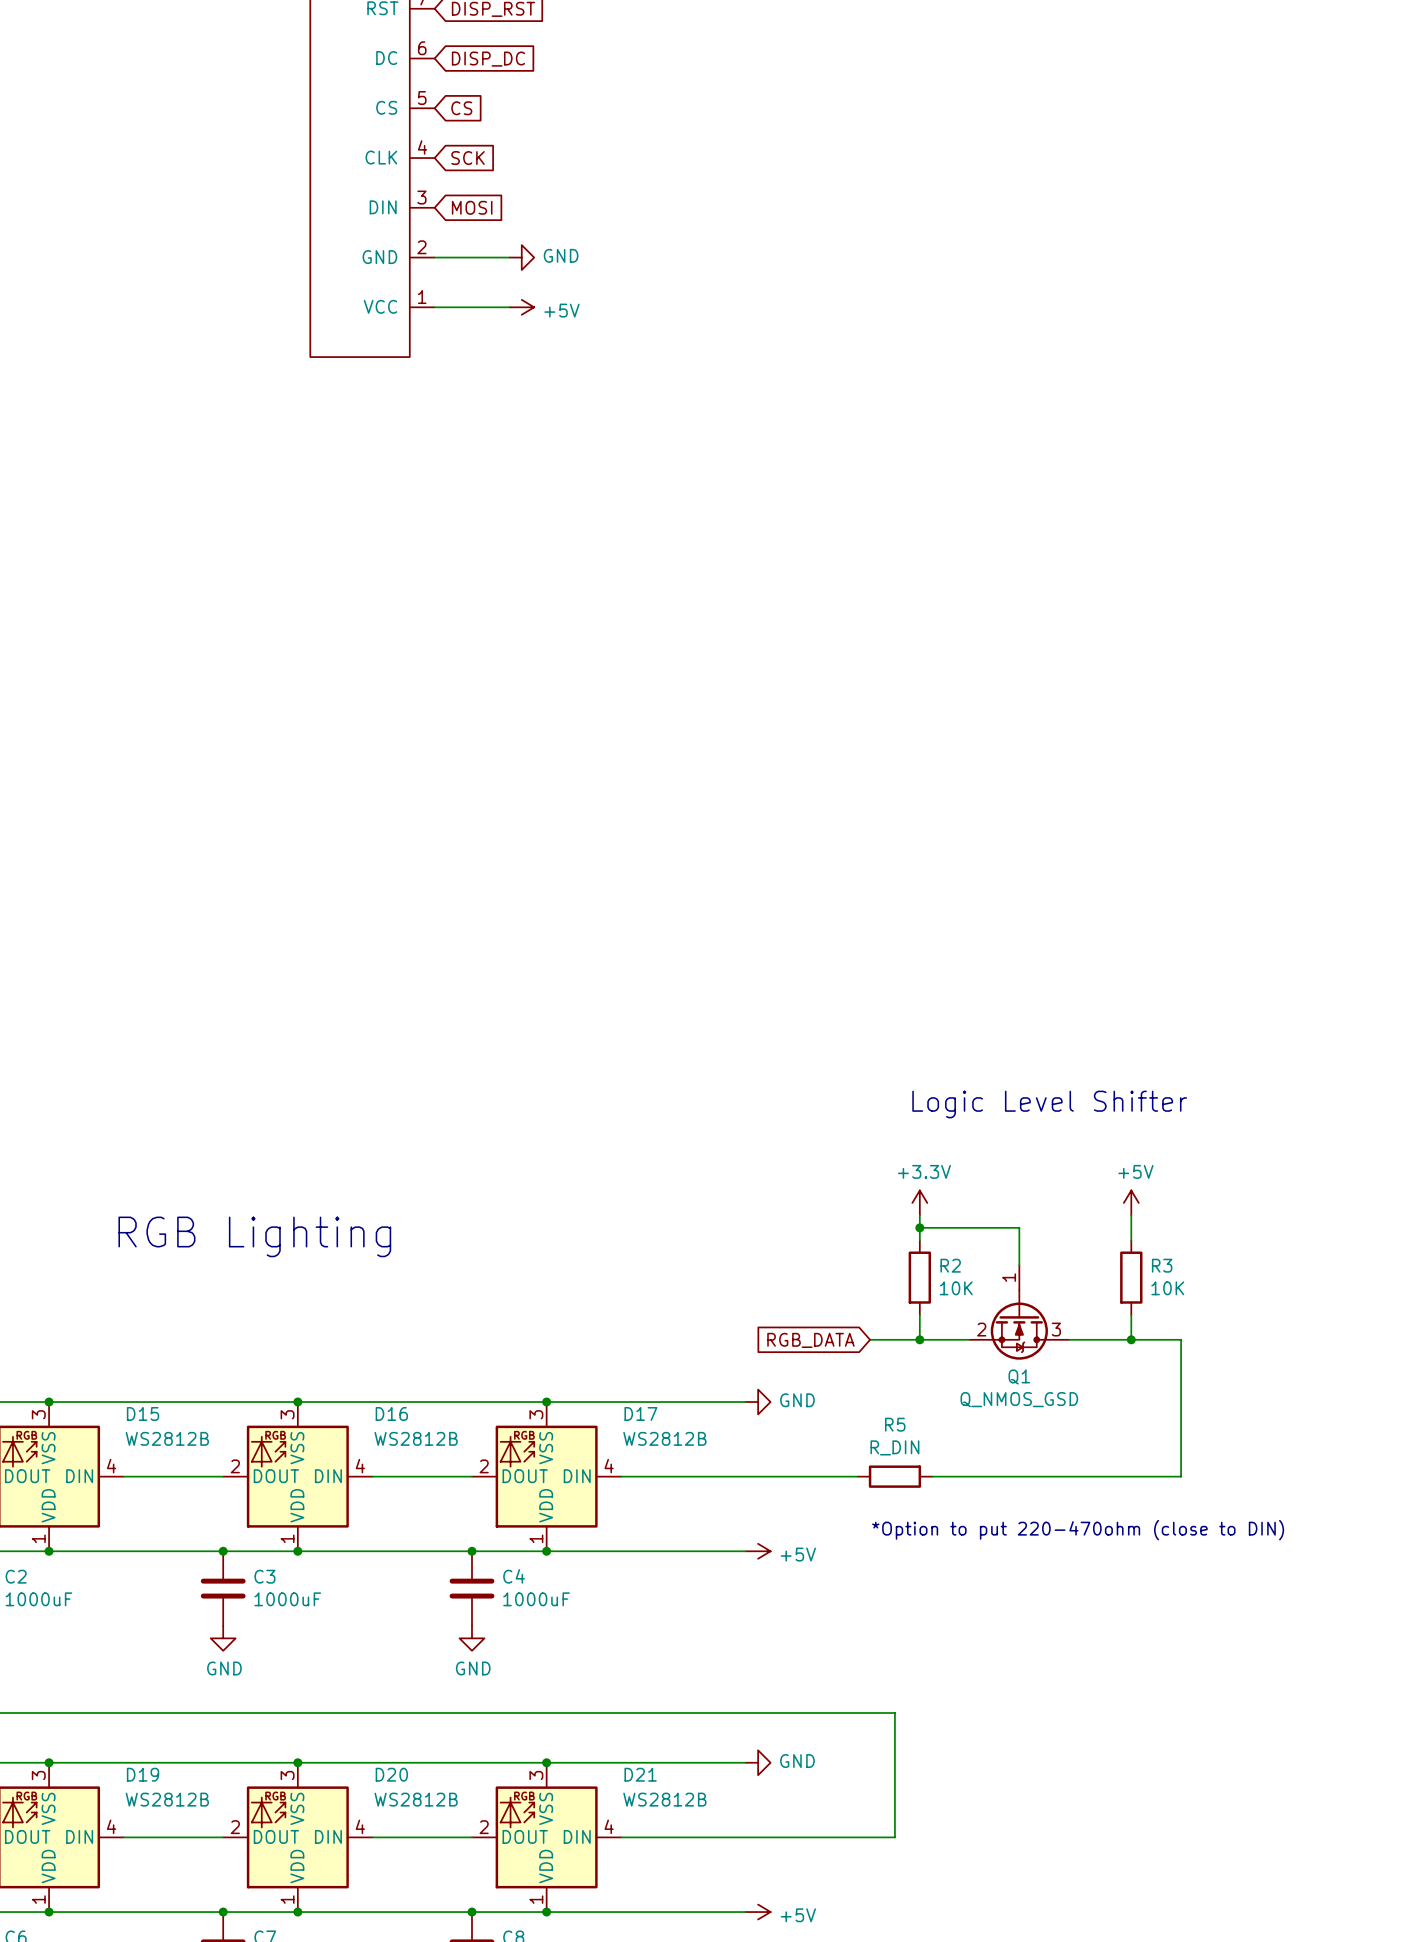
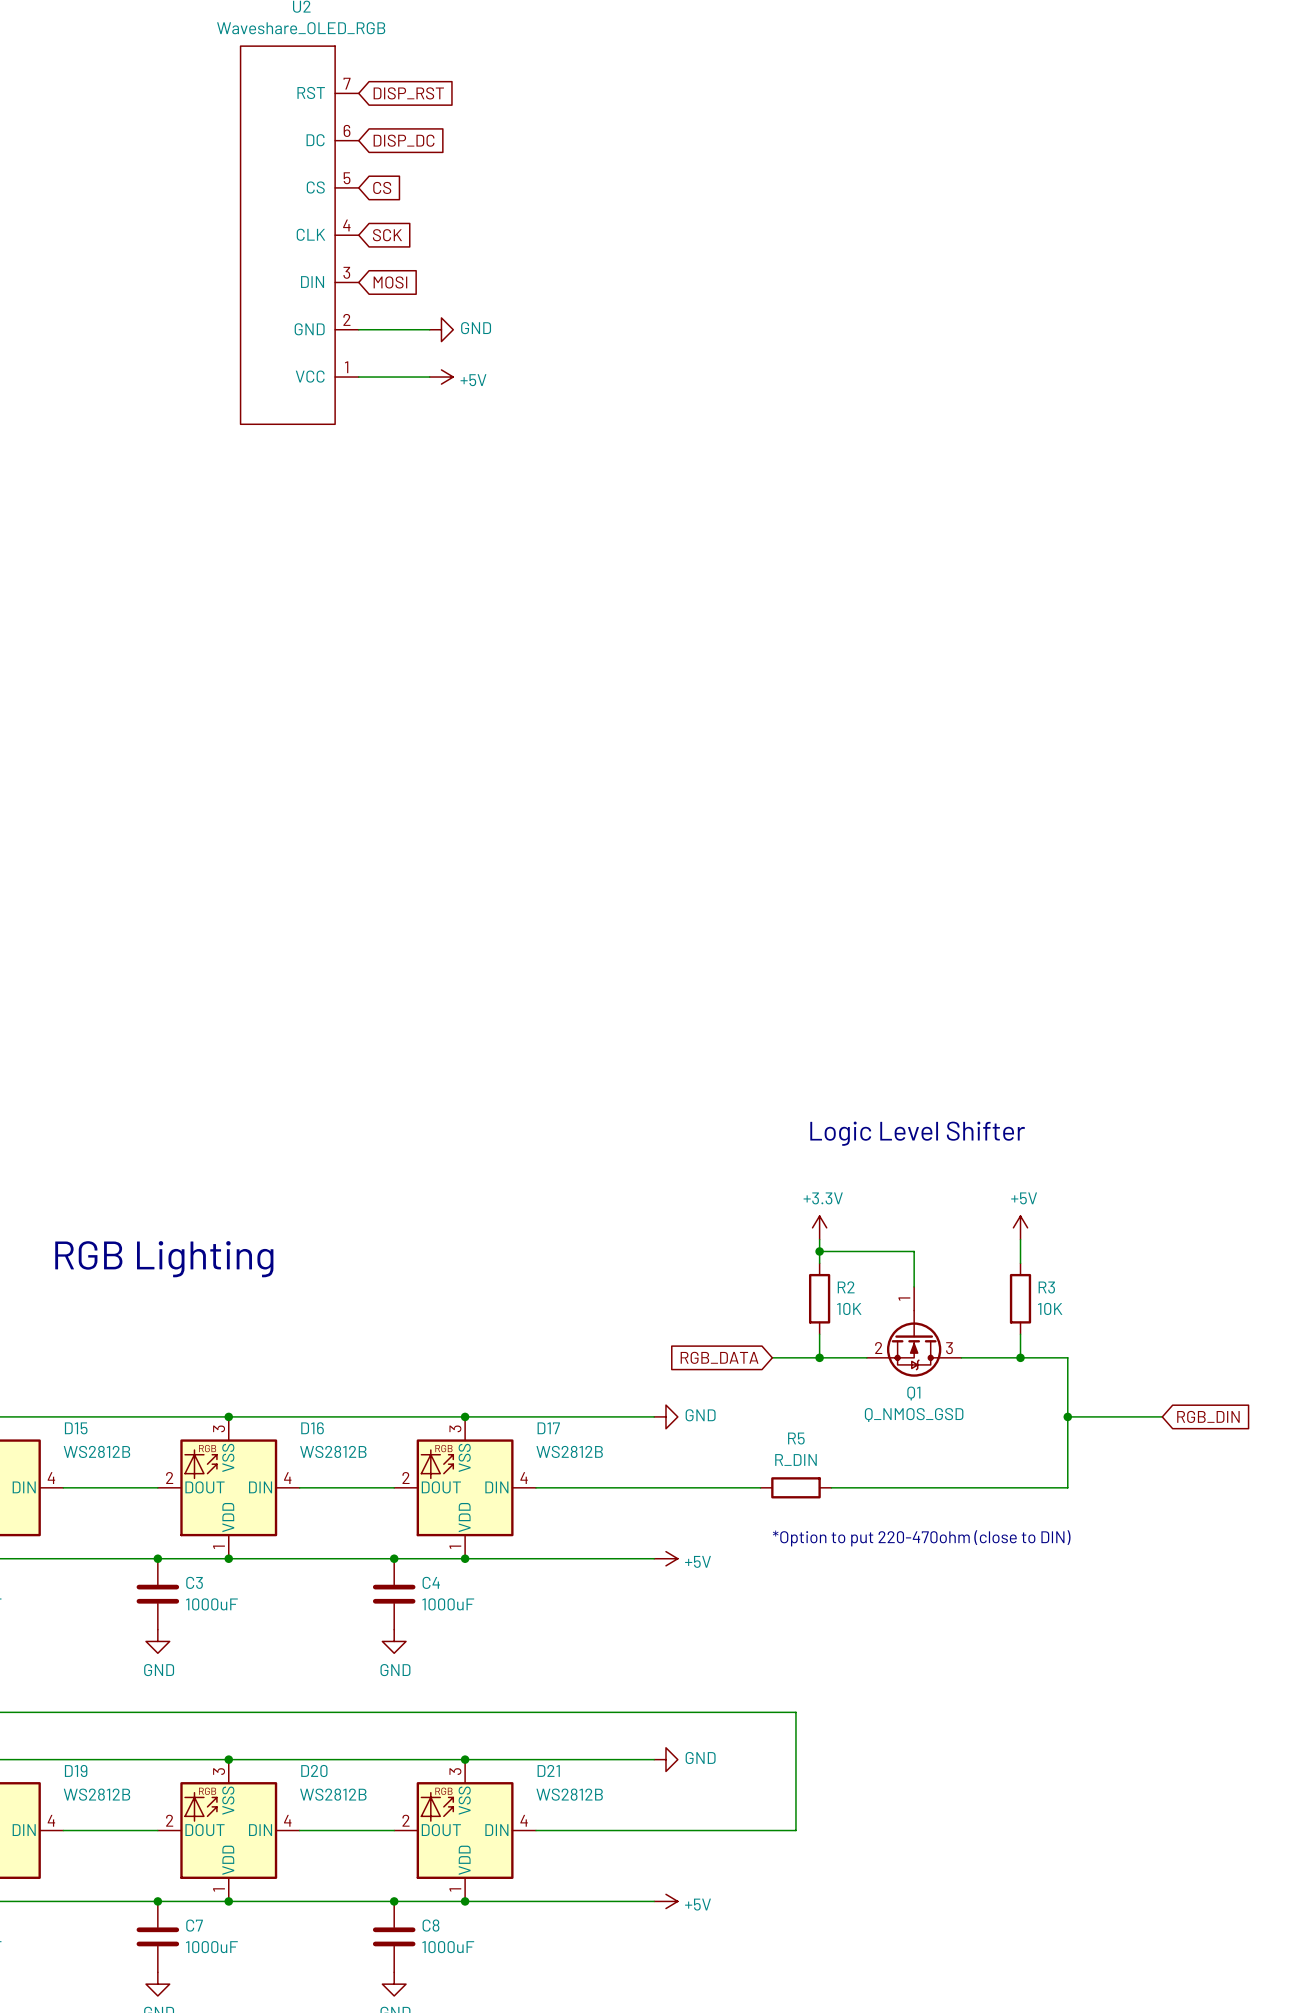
wire: none -> (1067, 1416) (1162, 1416)
junction: none -> (1067, 1416)
global label: none -> RGB_DIN (1208, 1416)

